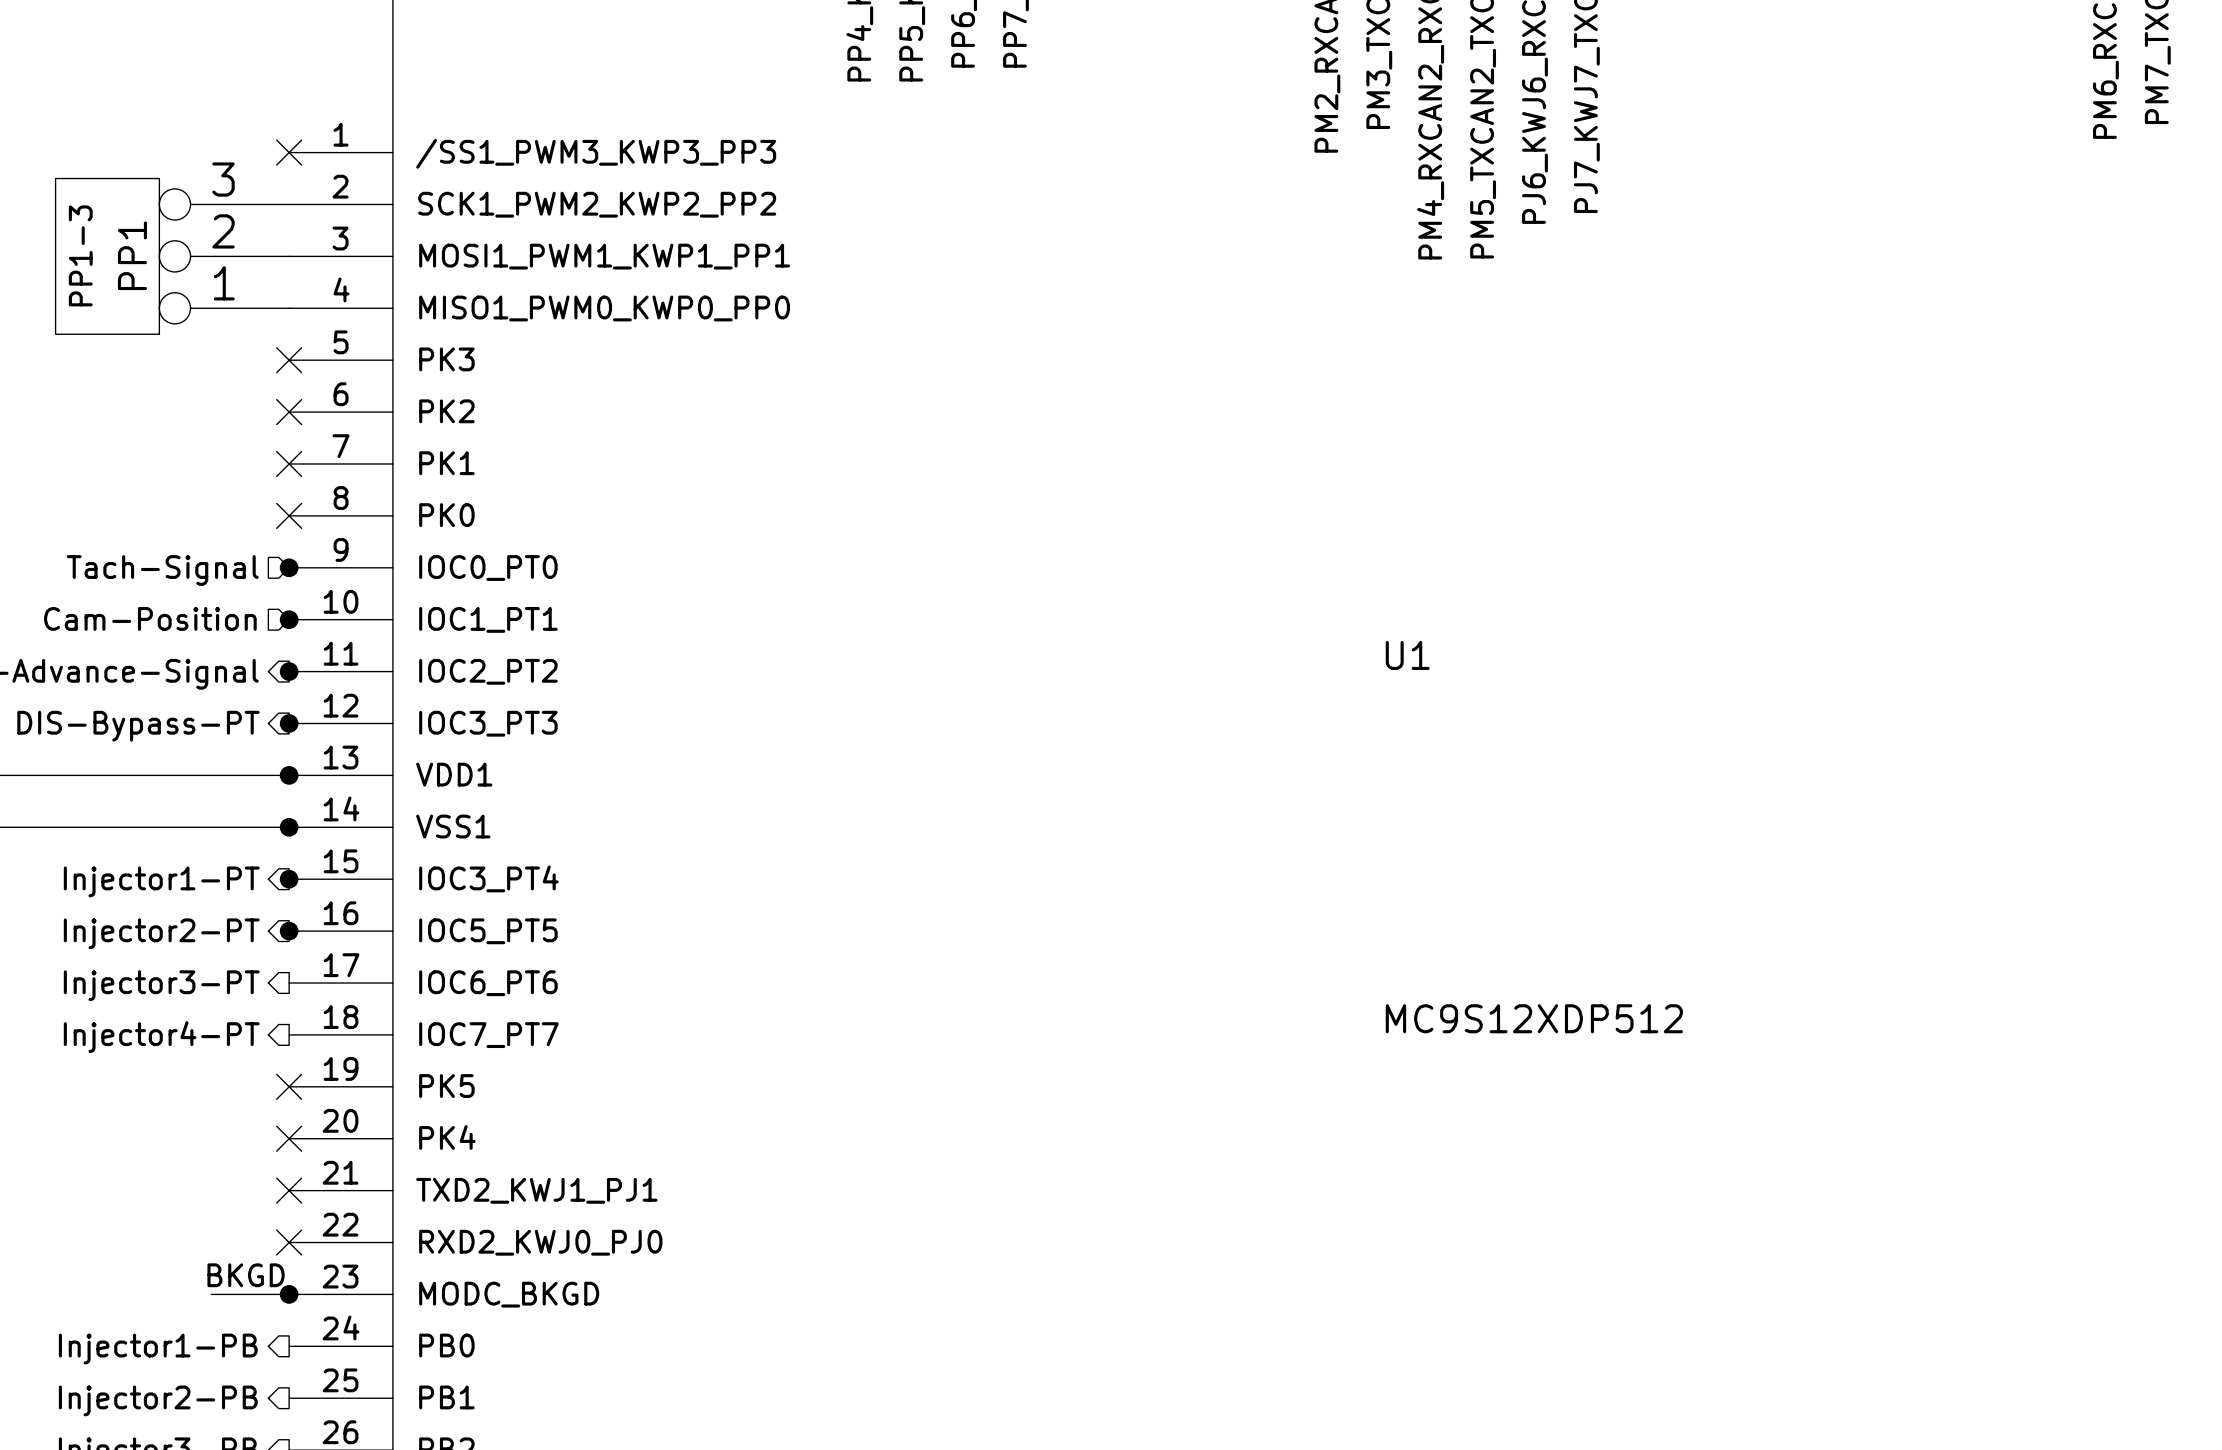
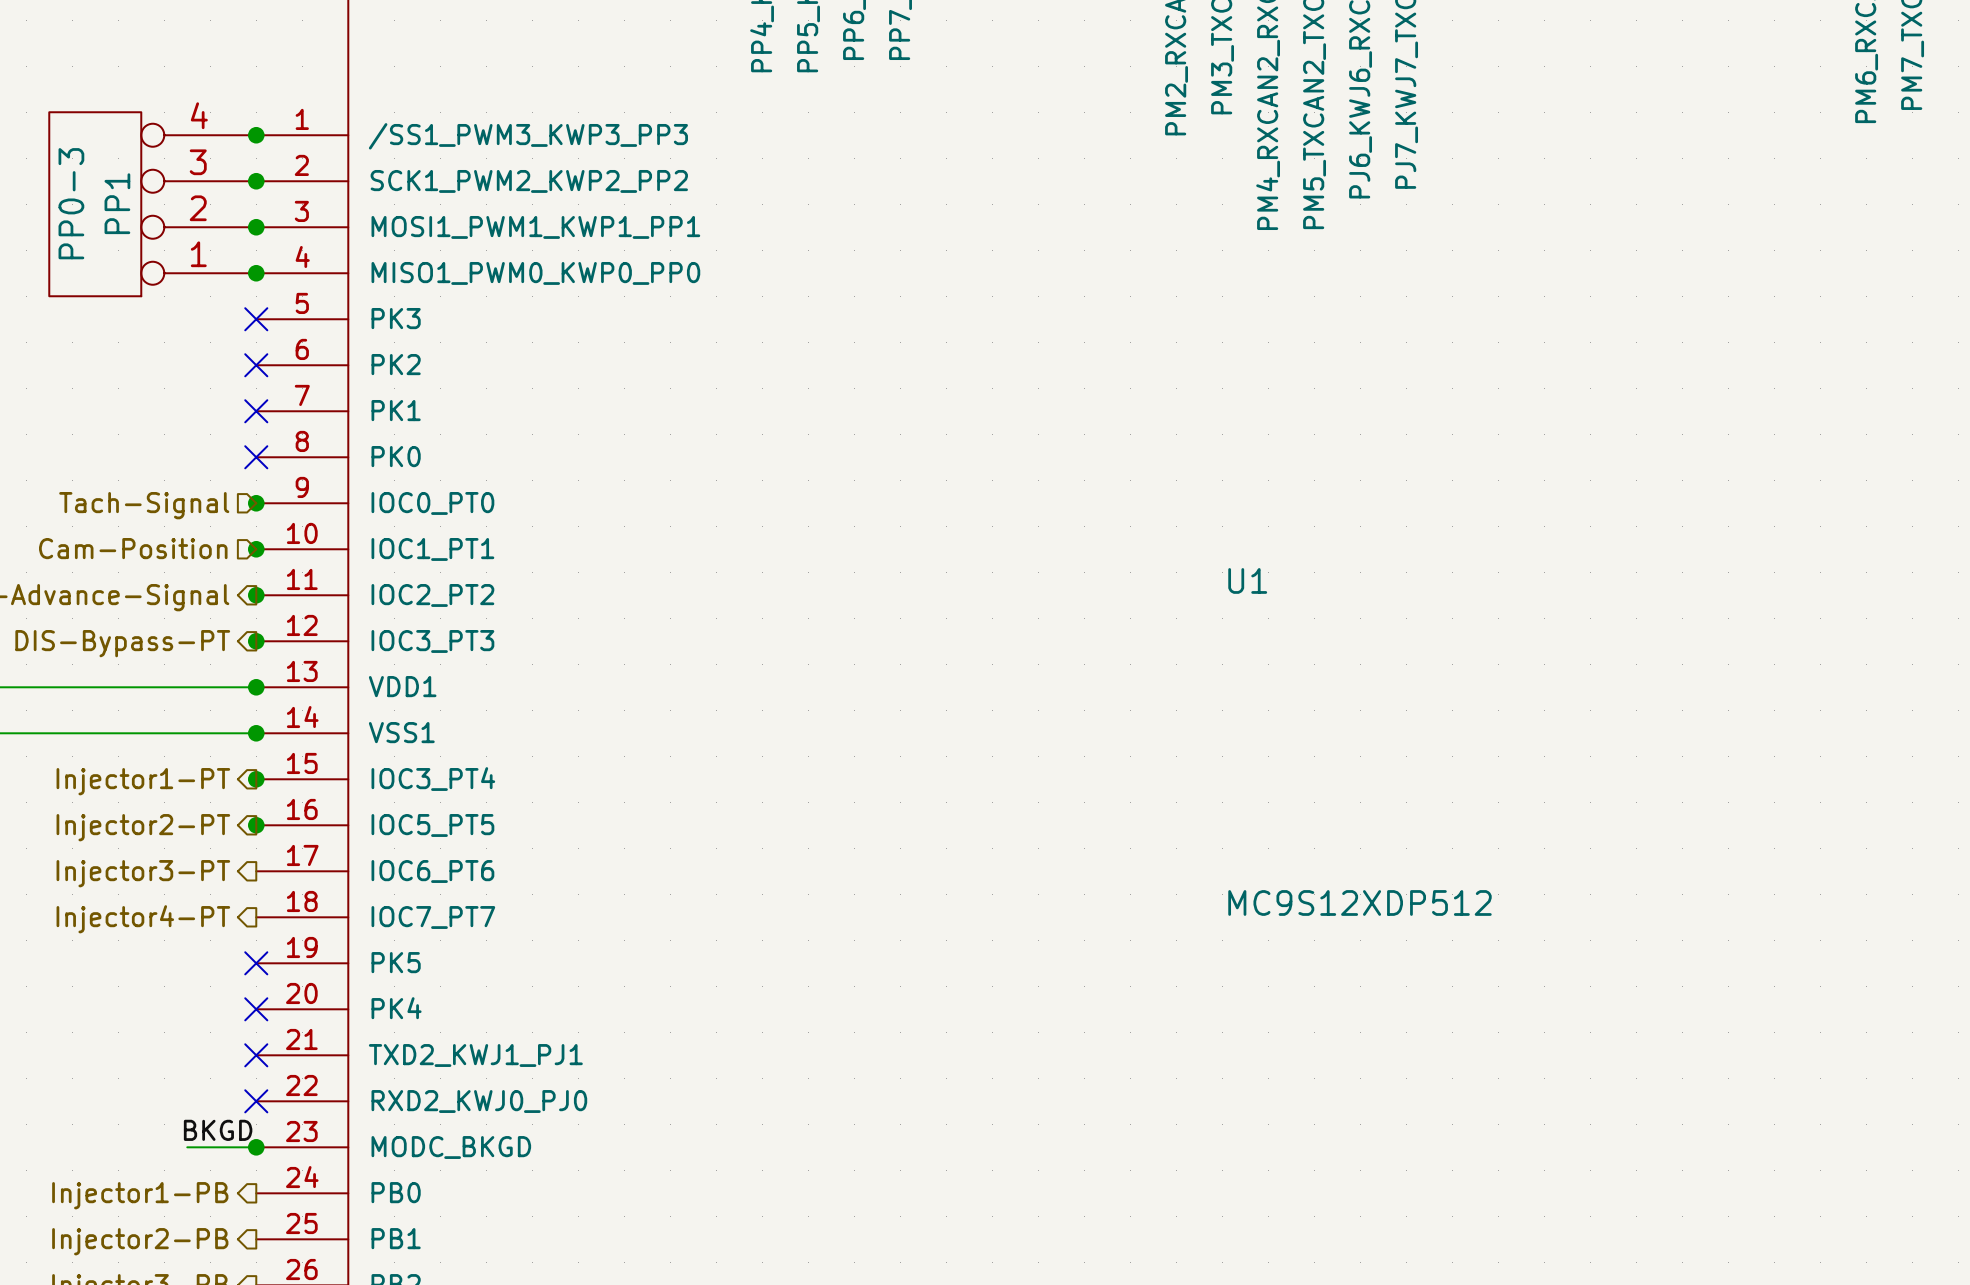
no-connect mark: (289, 152) -> none
junction: none -> (256, 135)
PP1 symbol: [55, 178, 290, 335] -> [49, 112, 257, 297]
junction: none -> (256, 181)
PP1 value: PP1-3 (80, 255) -> PP0-3 (71, 203)
junction: none -> (256, 227)
junction: none -> (256, 273)

